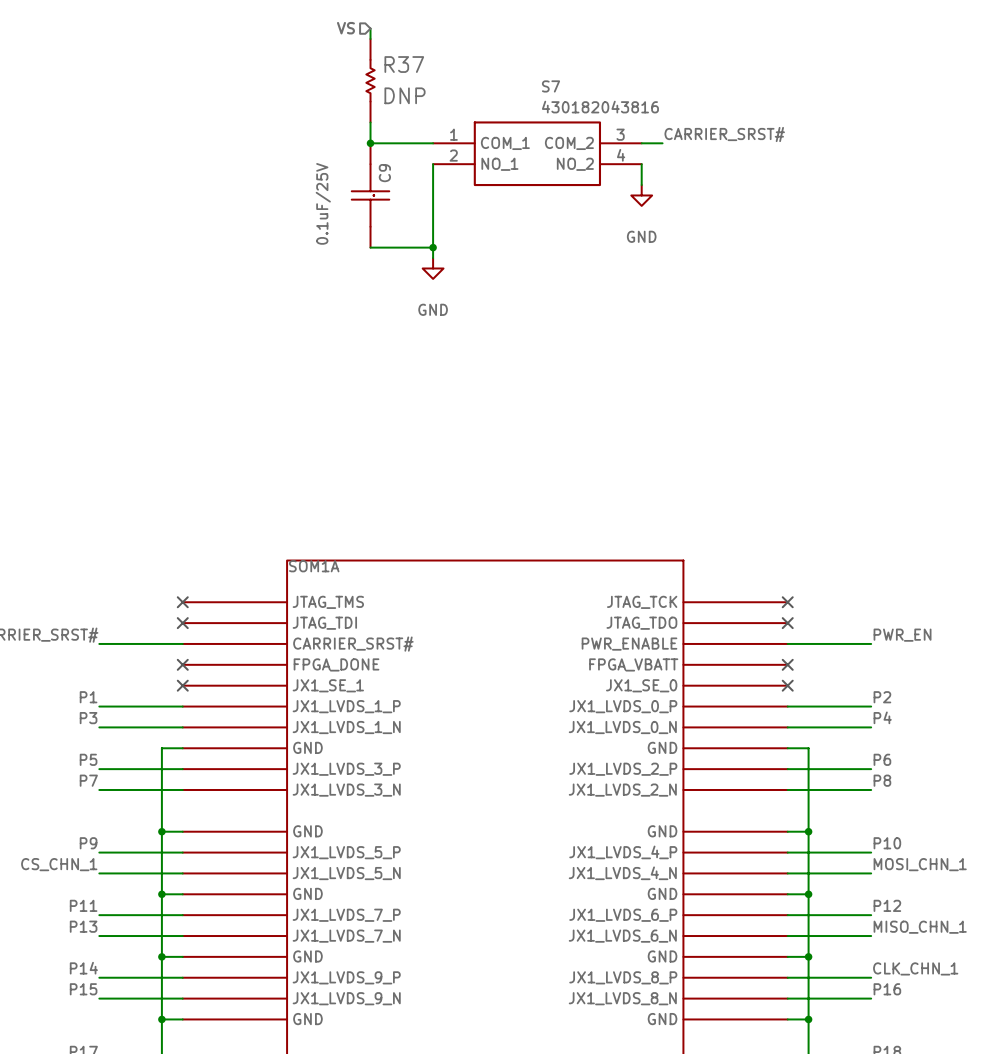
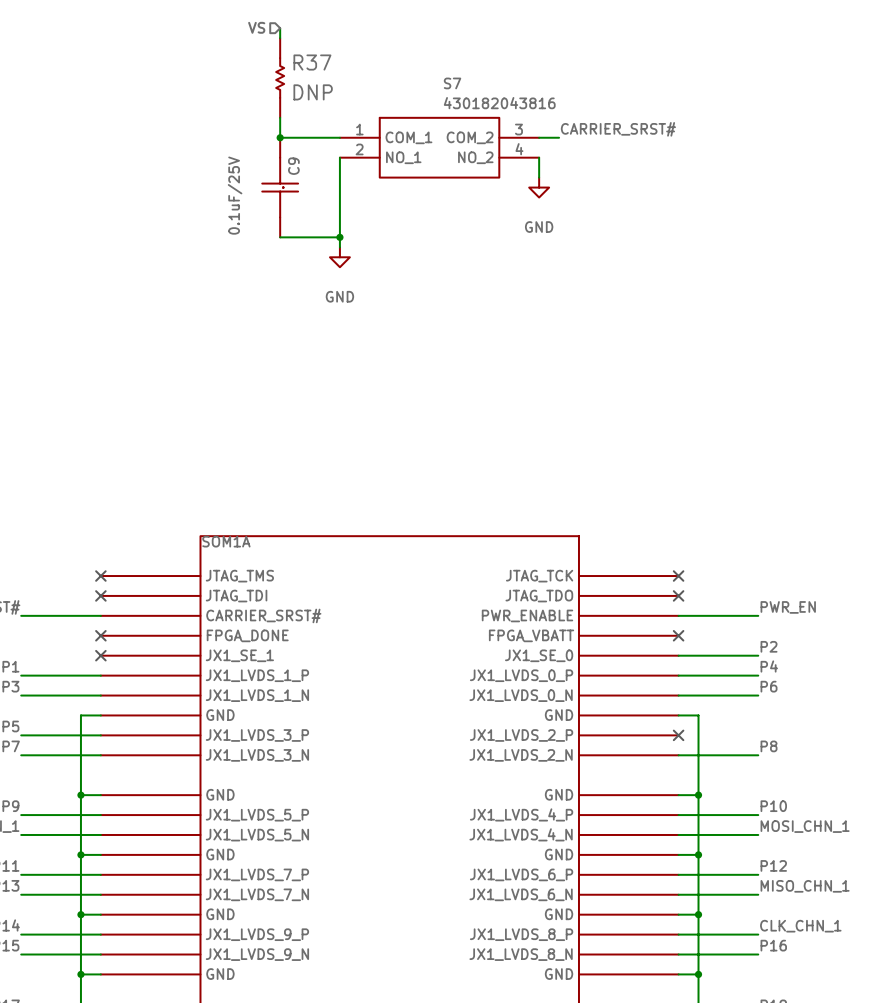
label: none -> P2 (769, 646)
no-connect mark: (787, 685) -> none
label: P2 (882, 697) -> P4 (769, 666)
label: P4 (882, 717) -> P6 (769, 686)
label: P6 (882, 759) -> none
wire: (787, 769) (871, 769) -> (678, 655) (758, 655)
no-connect mark: none -> (678, 735)

